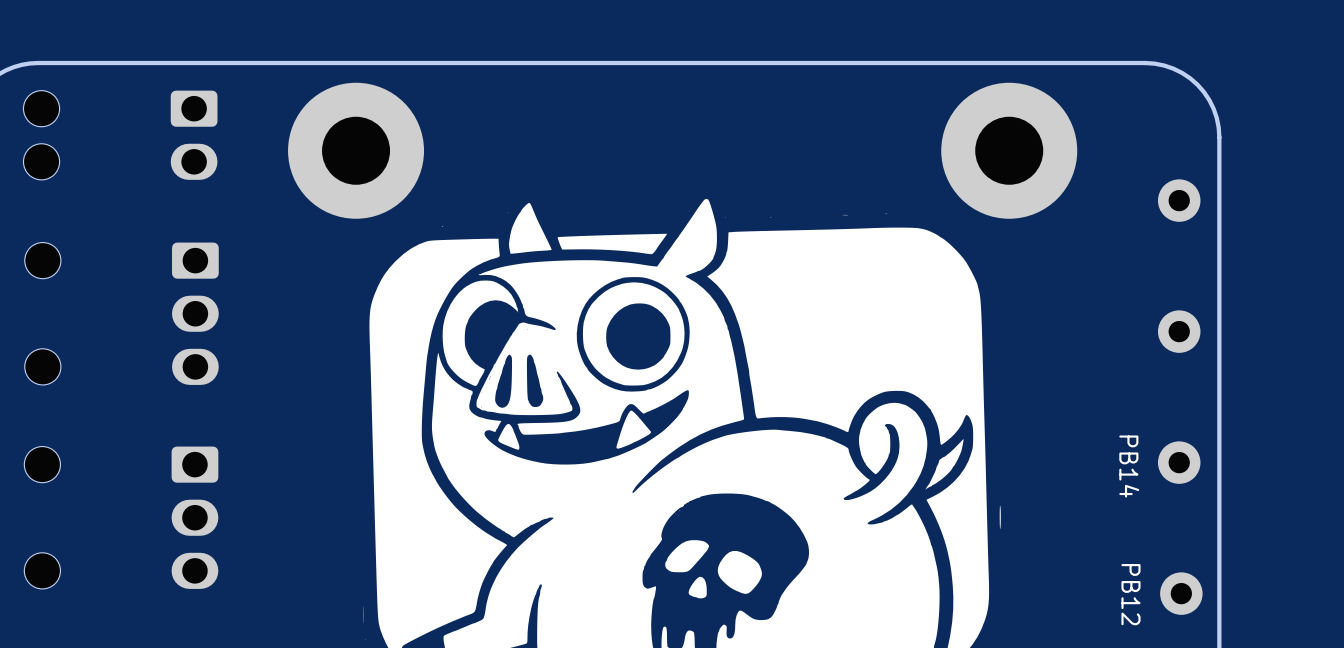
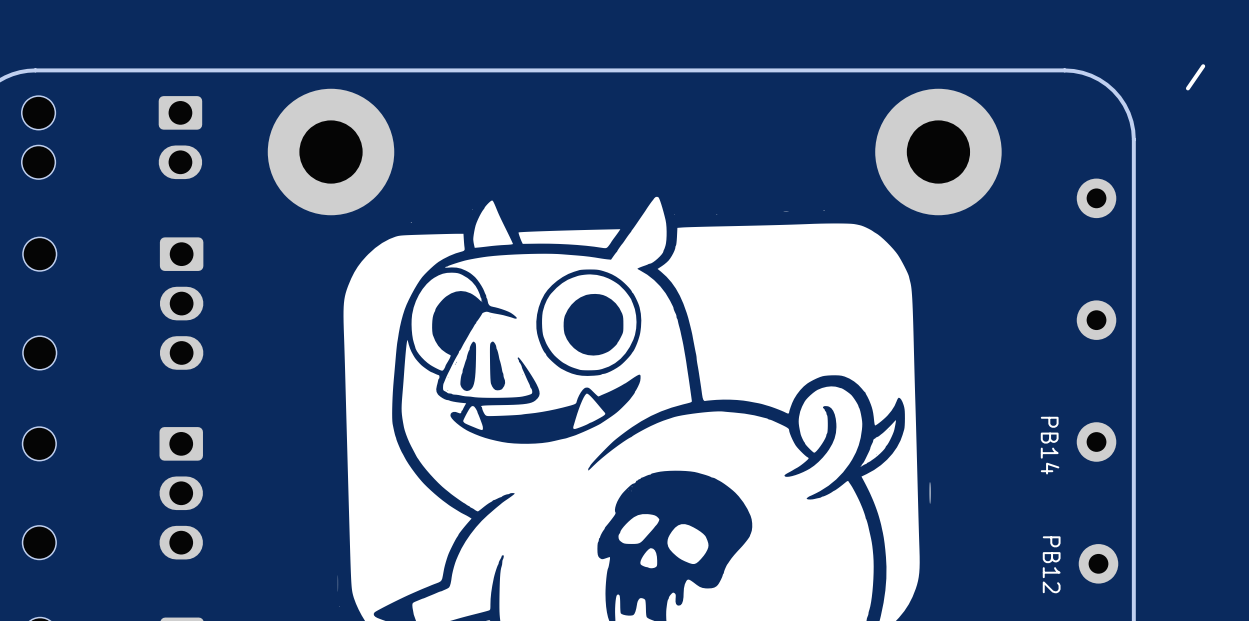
line: none -> (1203, 66) (1187, 88)

